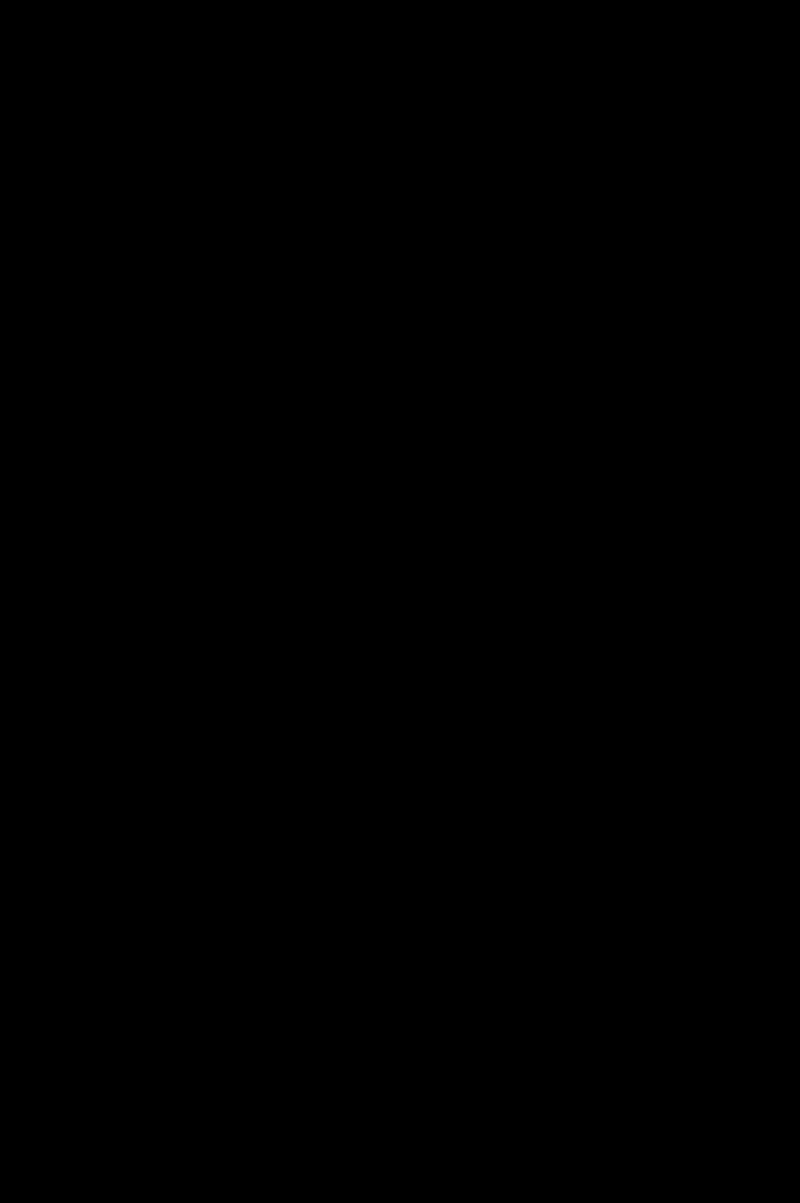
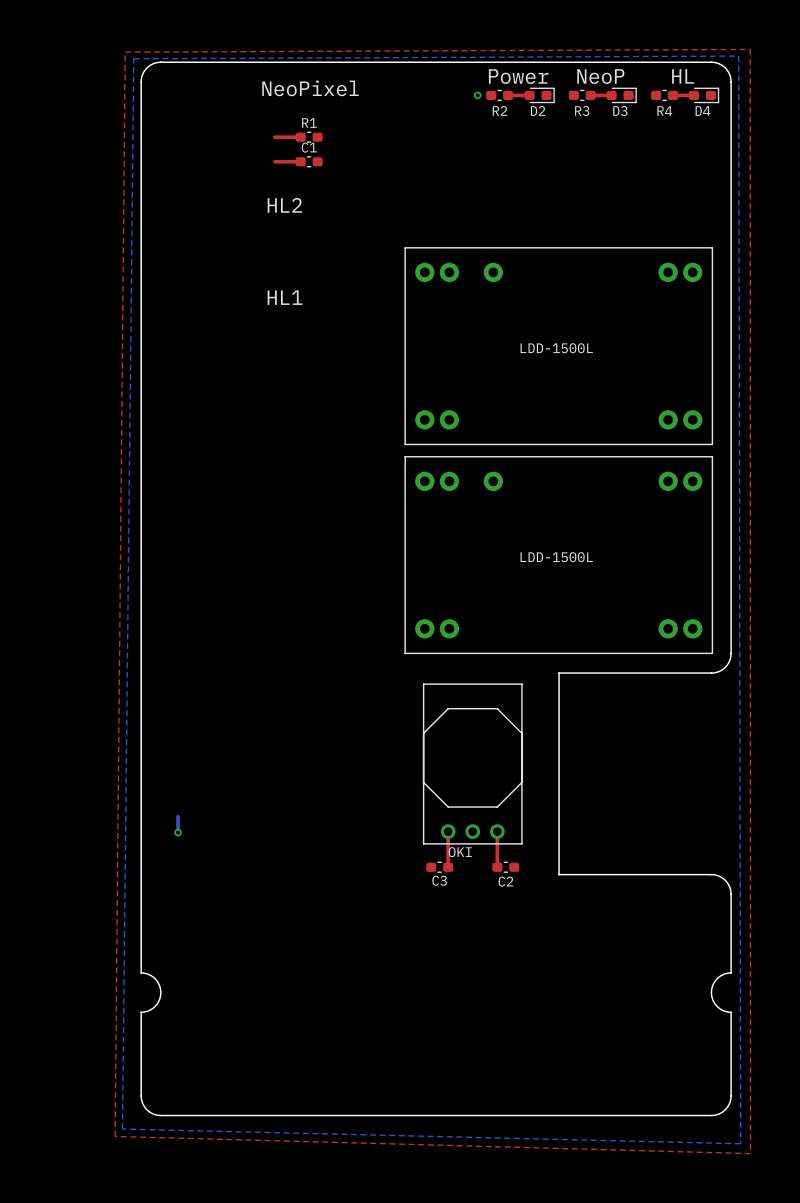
top zone outline: none -> (750, 49) (125, 52) (115, 1136) (750, 1153) (750, 49)
bottom zone outline: none -> (738, 56) (133, 58) (122, 1129) (740, 1143) (738, 56)
board edge: none -> (160, 62) (711, 62) (721, 64) (728, 72) (731, 81) (730, 658) (725, 667) (714, 672) (559, 673) (559, 874) (714, 874) (723, 878) (729, 886) (731, 972) (717, 978) (711, 992) (717, 1006) (731, 1012) (730, 1098) (728, 1105) (721, 1112) (711, 1115) (160, 1115) (150, 1112) (143, 1105) (141, 1095) (141, 1012) (155, 1006) (160, 992) (155, 978) (141, 972) (141, 81) (146, 67) (160, 62)
text: none -> Power (518, 76)
text: none -> NeoP (600, 76)
text: none -> HL (683, 76)
text: none -> NeoPixel (310, 88)
via: none -> (477, 95)
R2: none -> (499, 95)
top track: none -> (508, 95) (529, 95)
D2: none -> (539, 95)
R3: none -> (582, 95)
top track: none -> (590, 95) (611, 95)
D3: none -> (621, 95)
R4: none -> (664, 95)
top track: none -> (673, 95) (693, 95)
D4: none -> (704, 95)
top track: none -> (274, 137) (300, 137)
R1: none -> (309, 137)
top track: none -> (274, 161) (300, 161)
C1: none -> (309, 161)
text: none -> HL2 (284, 205)
text: none -> HL1 (285, 297)
part: none -> LDD-1500L (558, 346)
part: none -> LDD-1500L (558, 555)
part: none -> OKI (472, 764)
bottom track: none -> (178, 816) (178, 832)
top track: none -> (448, 831) (448, 867)
top track: none -> (497, 831) (497, 867)
via: none -> (178, 832)
C3: none -> (439, 867)
C2: none -> (505, 867)

